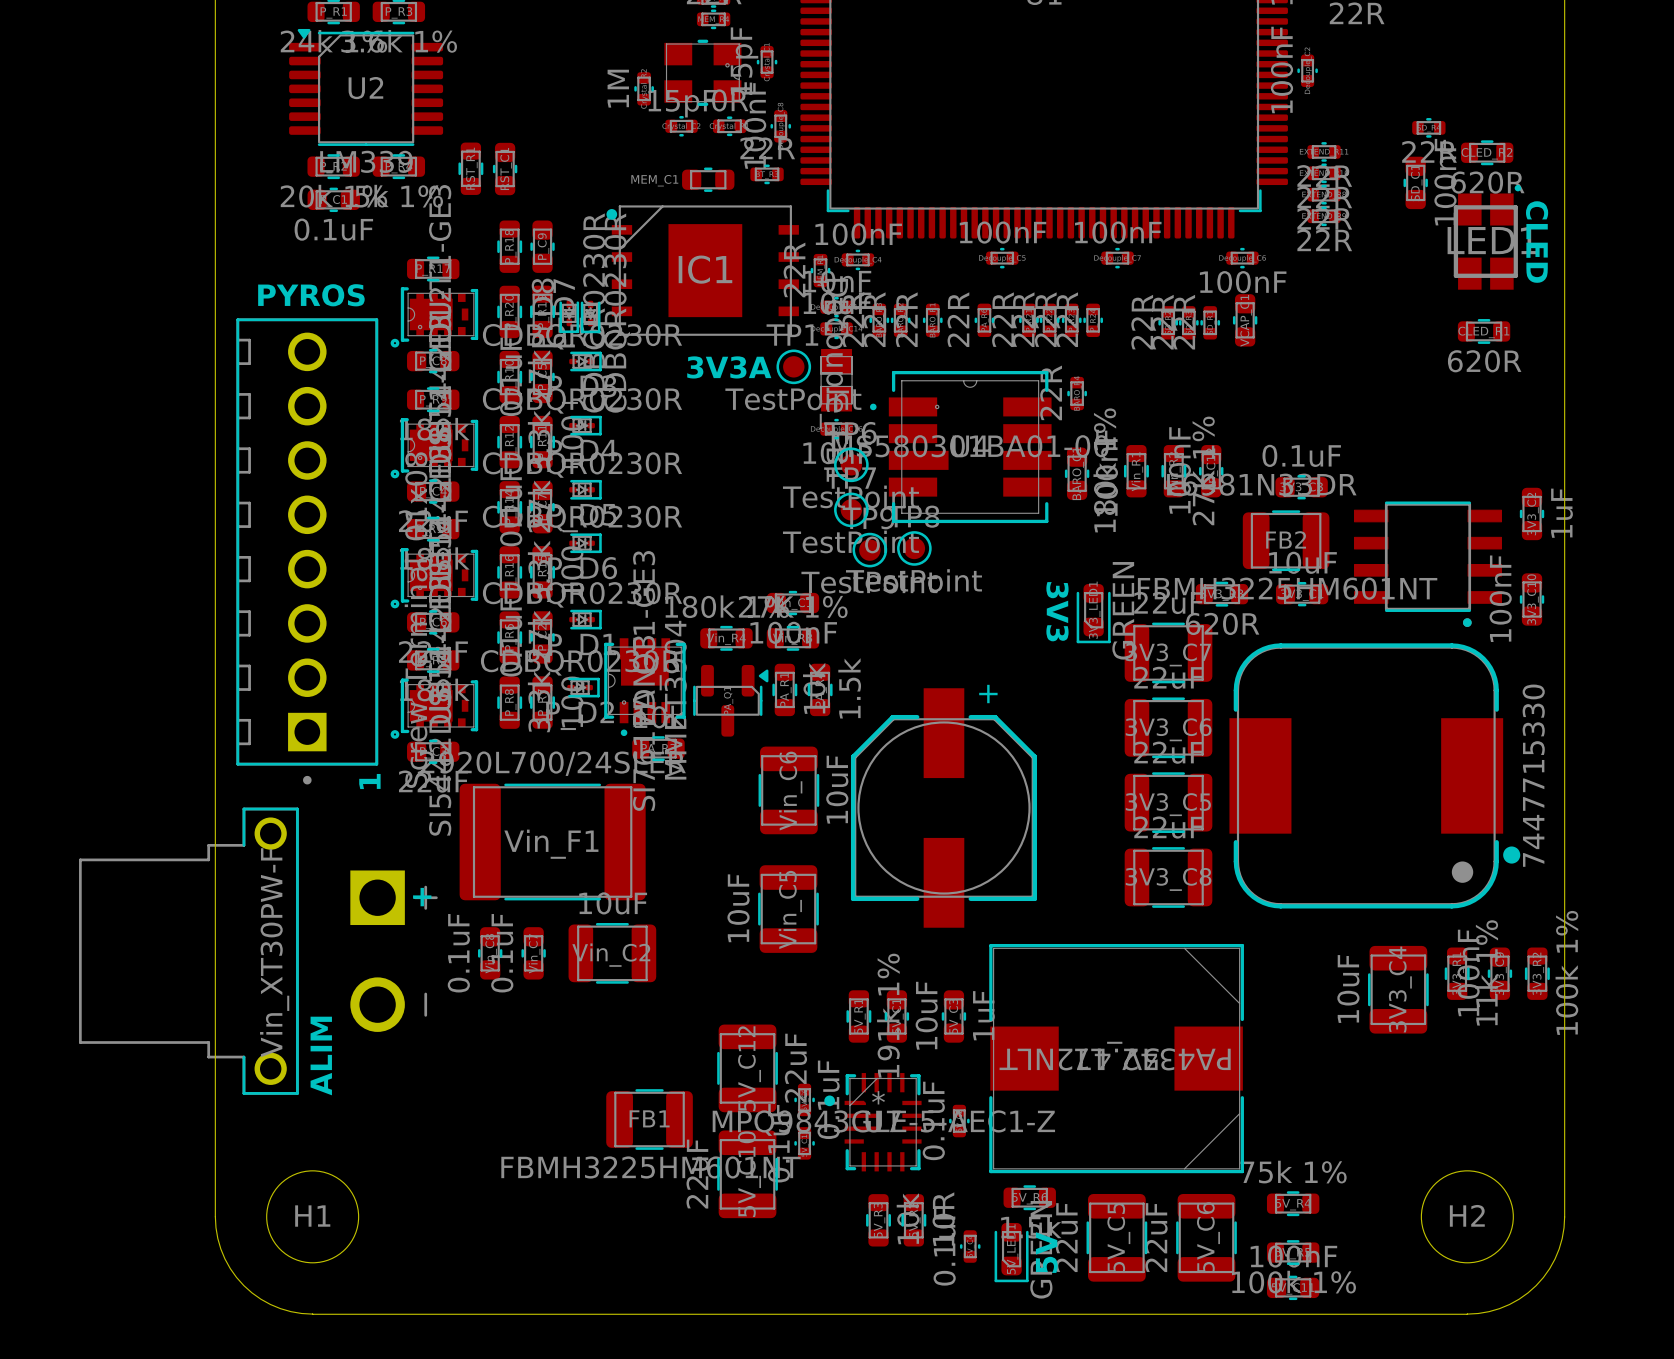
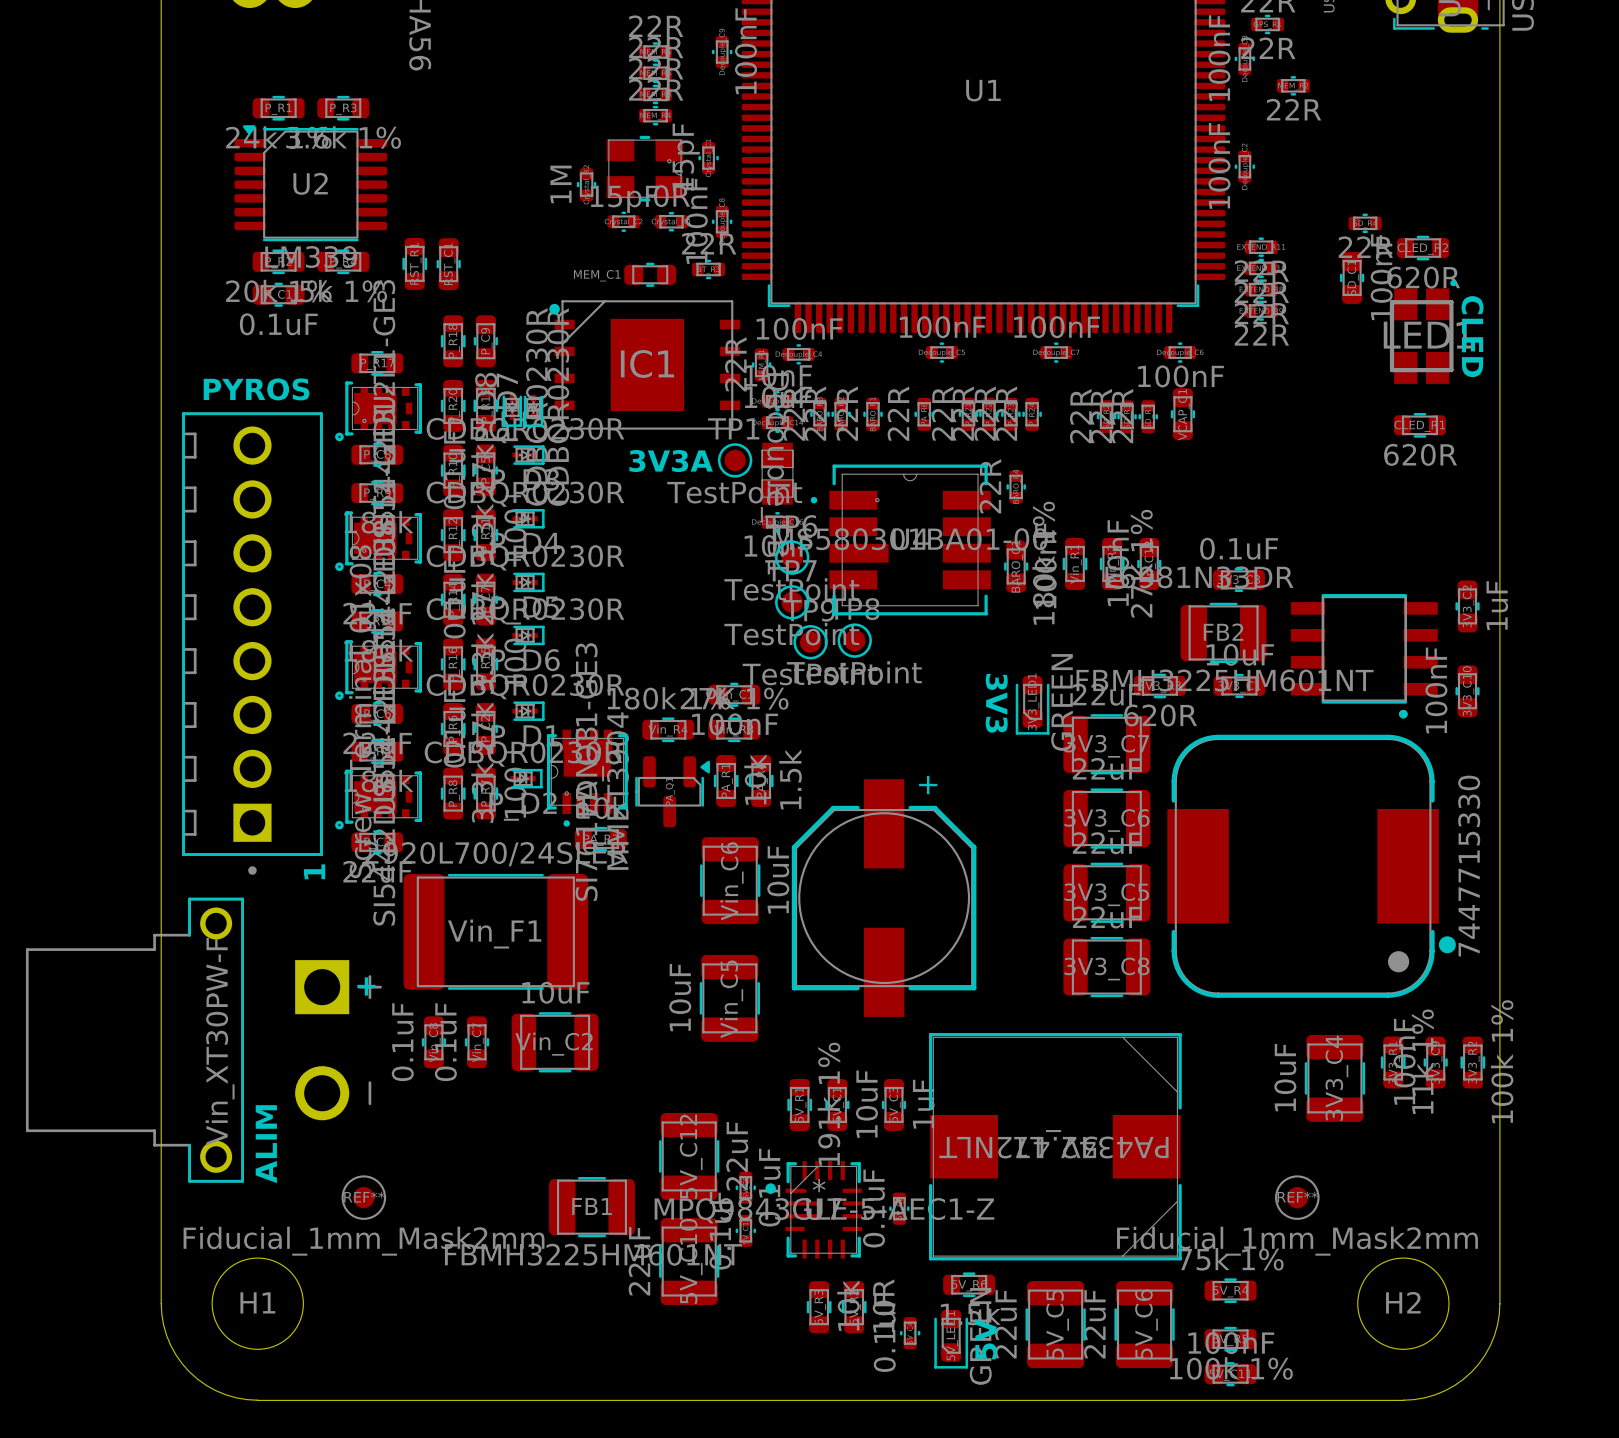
REF**: none -> Fiducial_1mm_Mask2mm (363, 1197)
REF**: none -> Fiducial_1mm_Mask2mm (1297, 1197)

